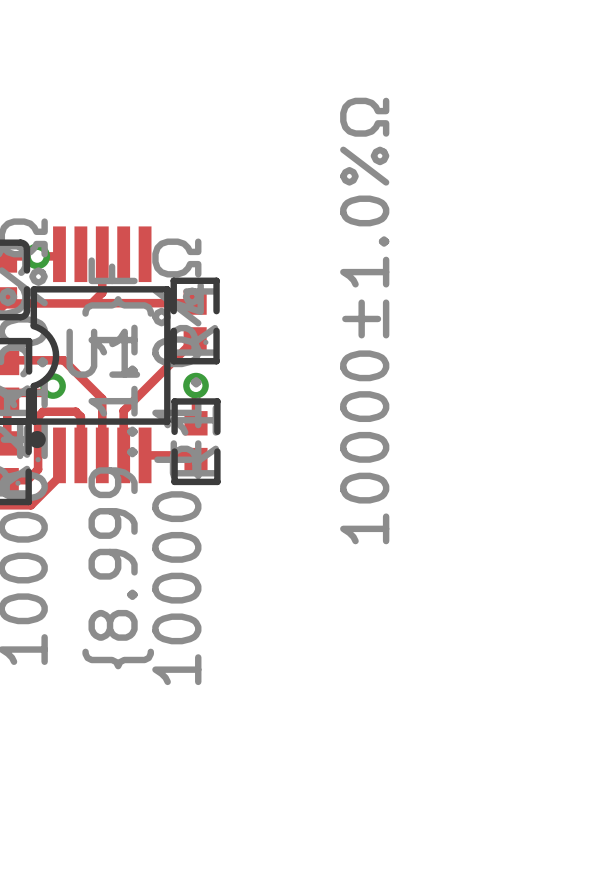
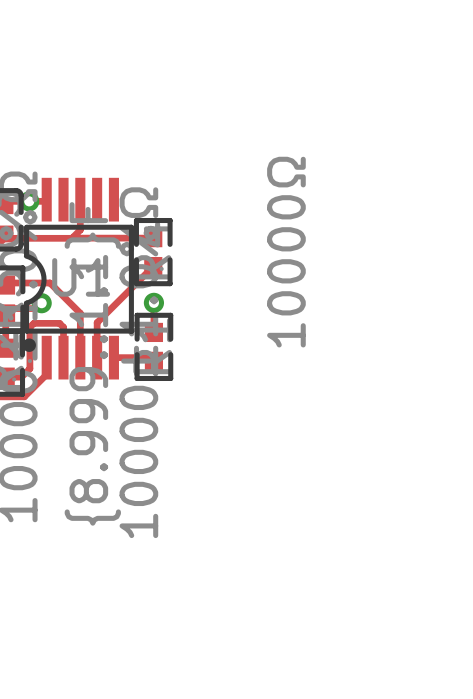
part value: 10000±1.0%Ω (364, 321) -> 10000Ω (286, 252)

